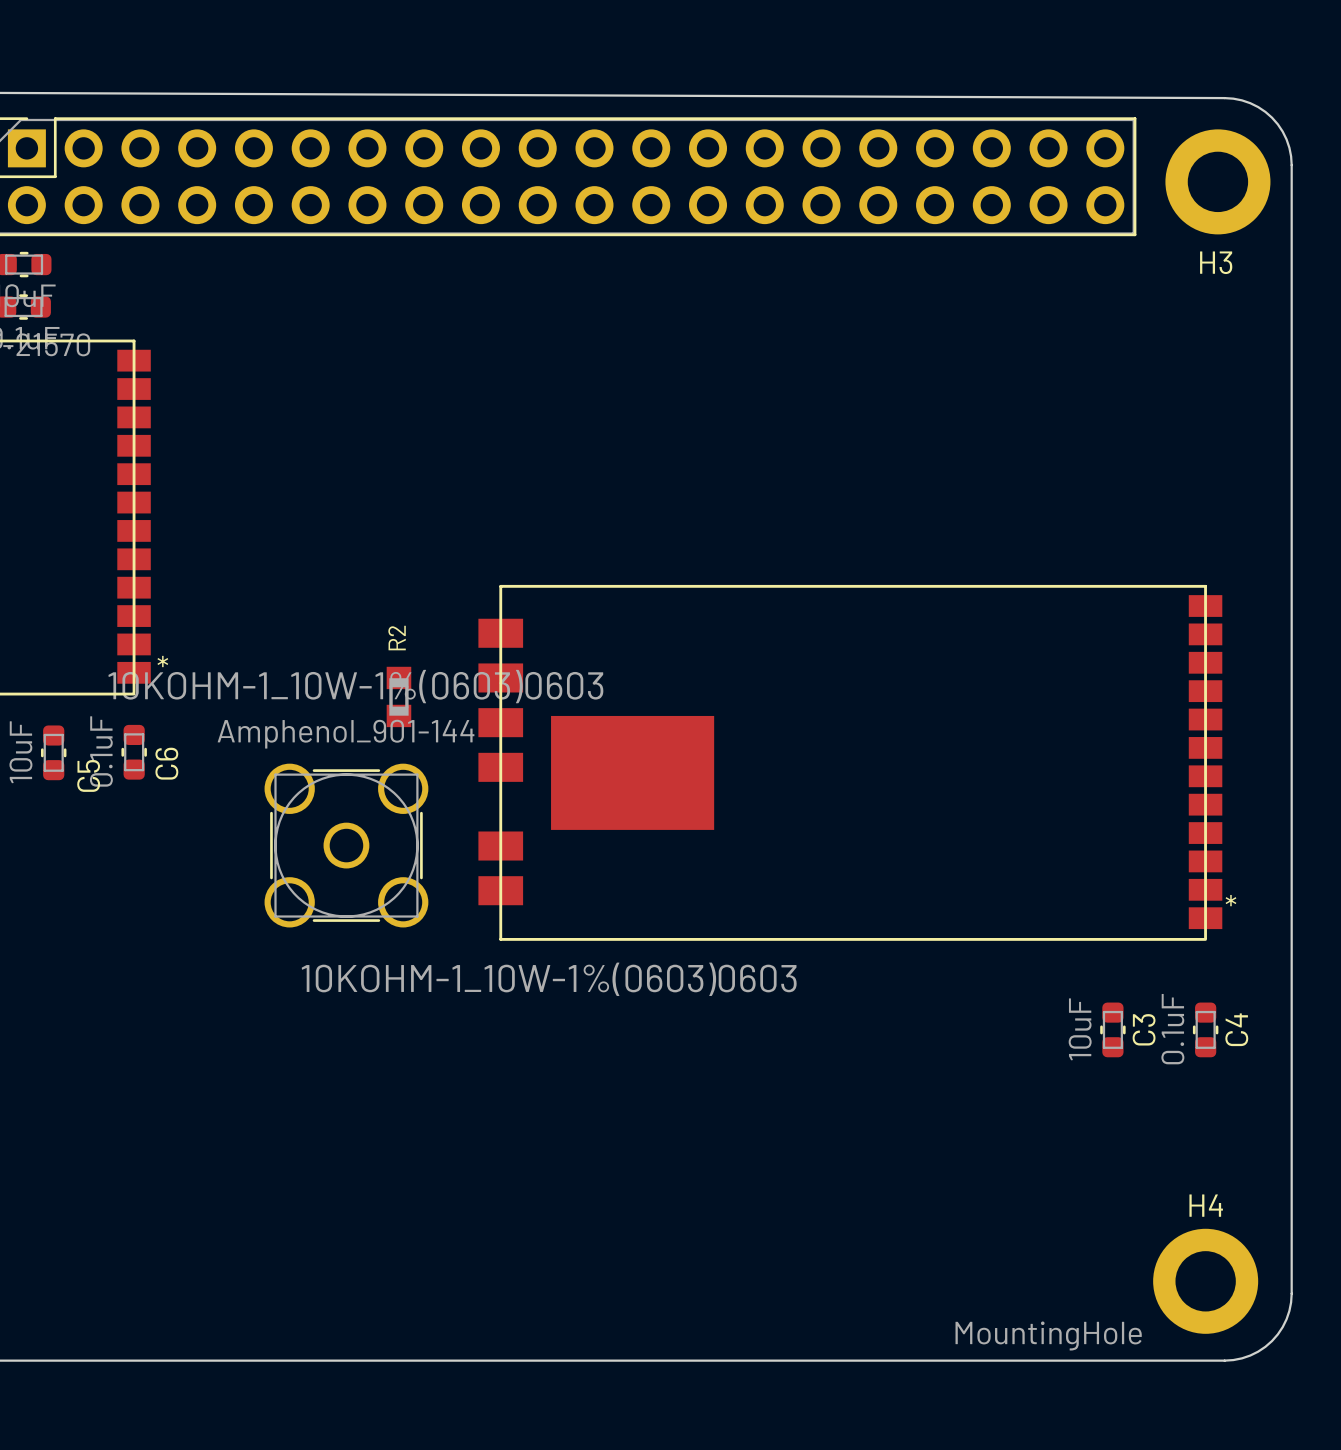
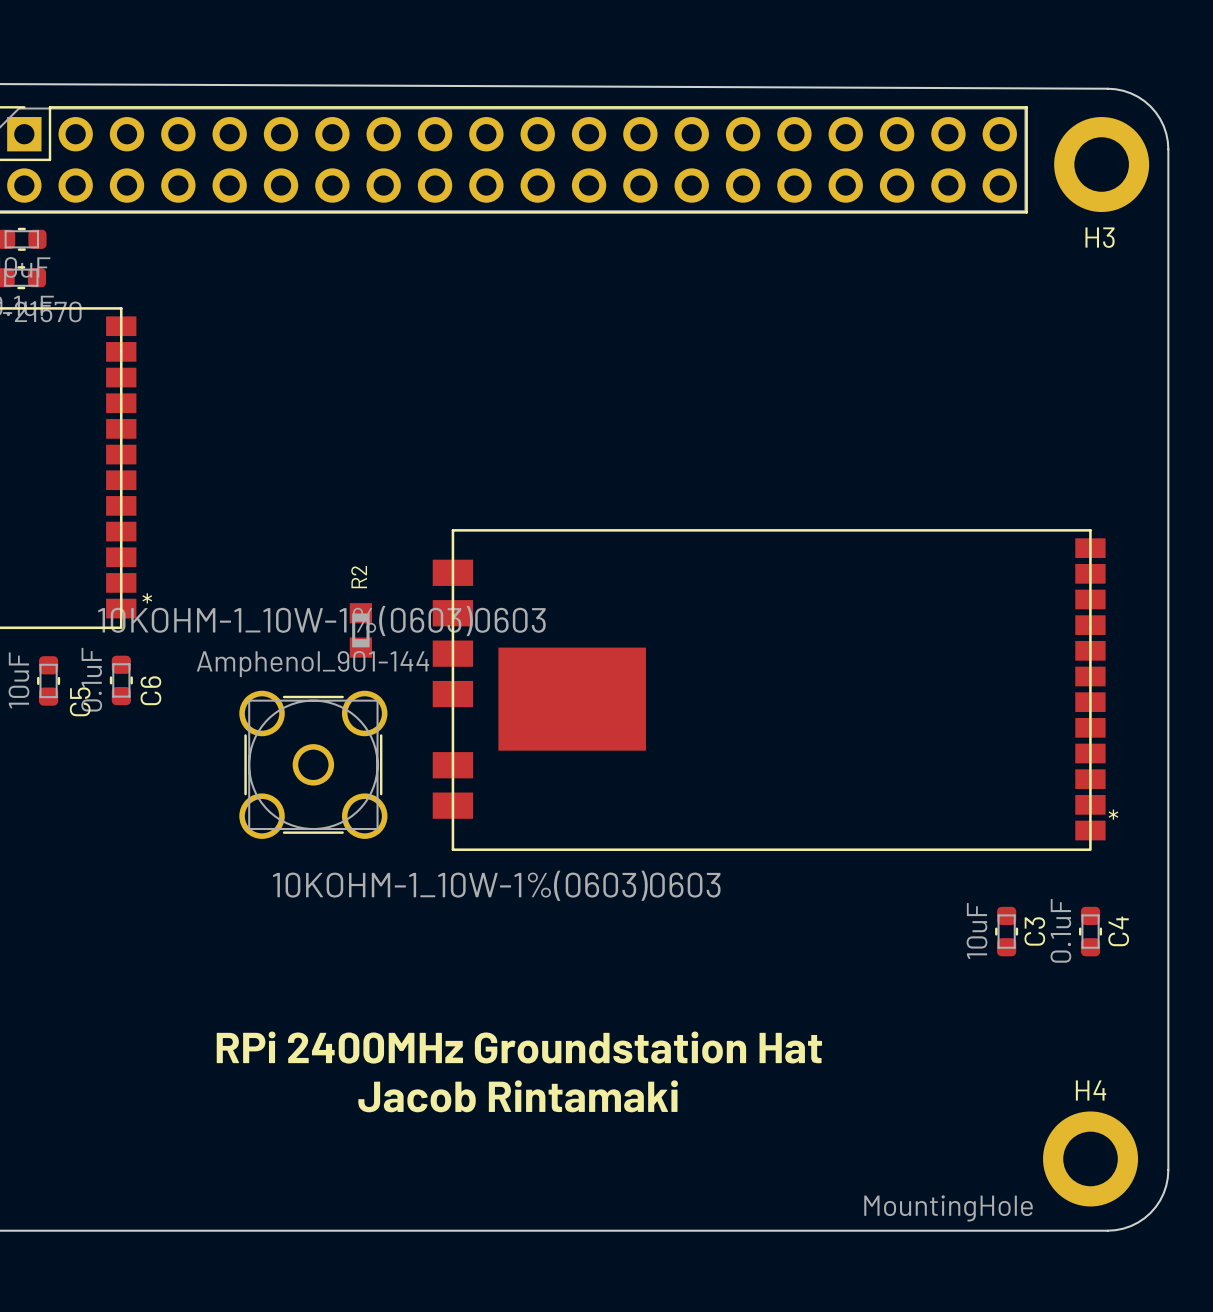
text: none -> RPi 2400MHz Groundstation Hat (519, 1047)
text: none -> Jacob Rintamaki (518, 1096)

